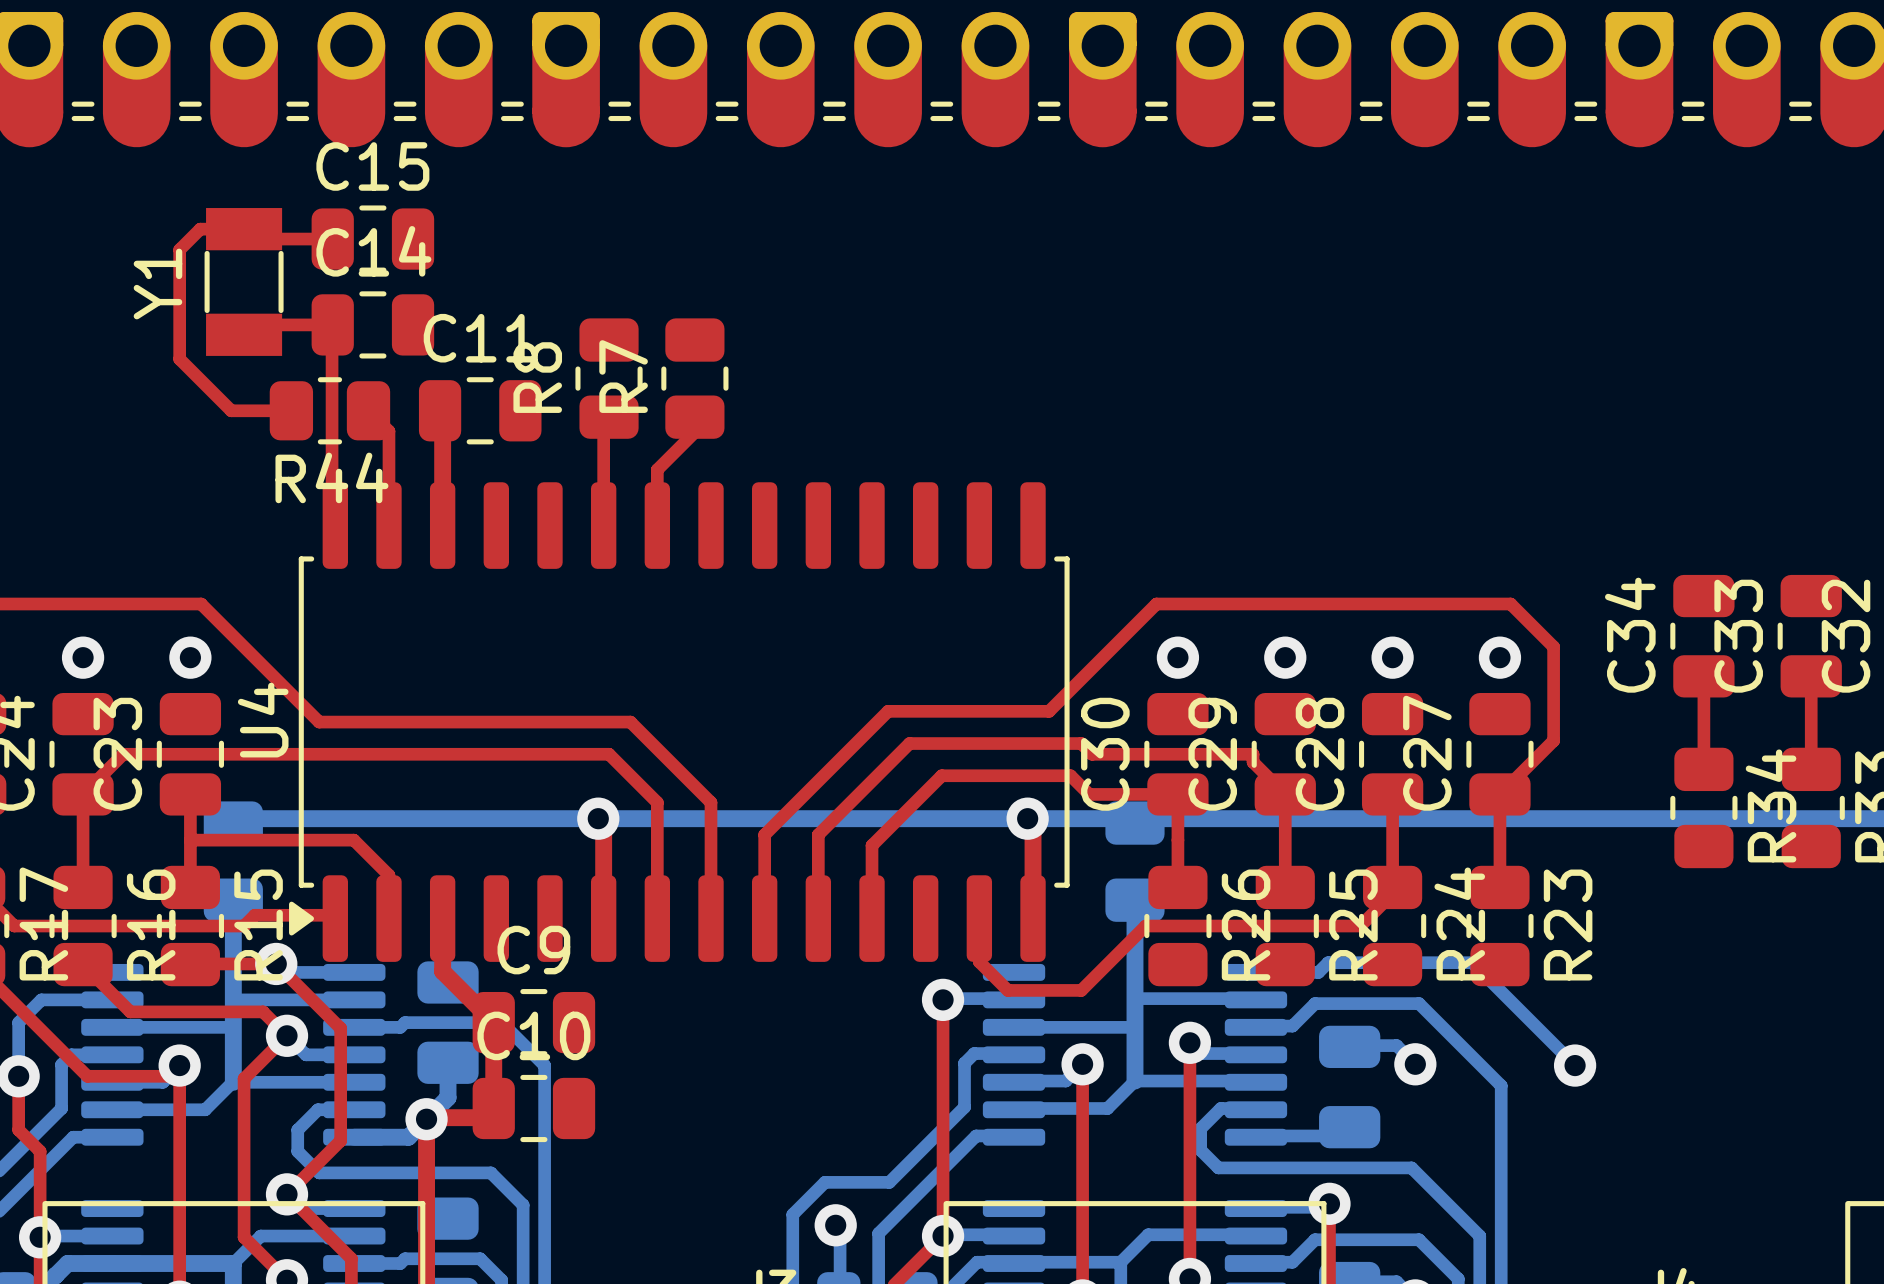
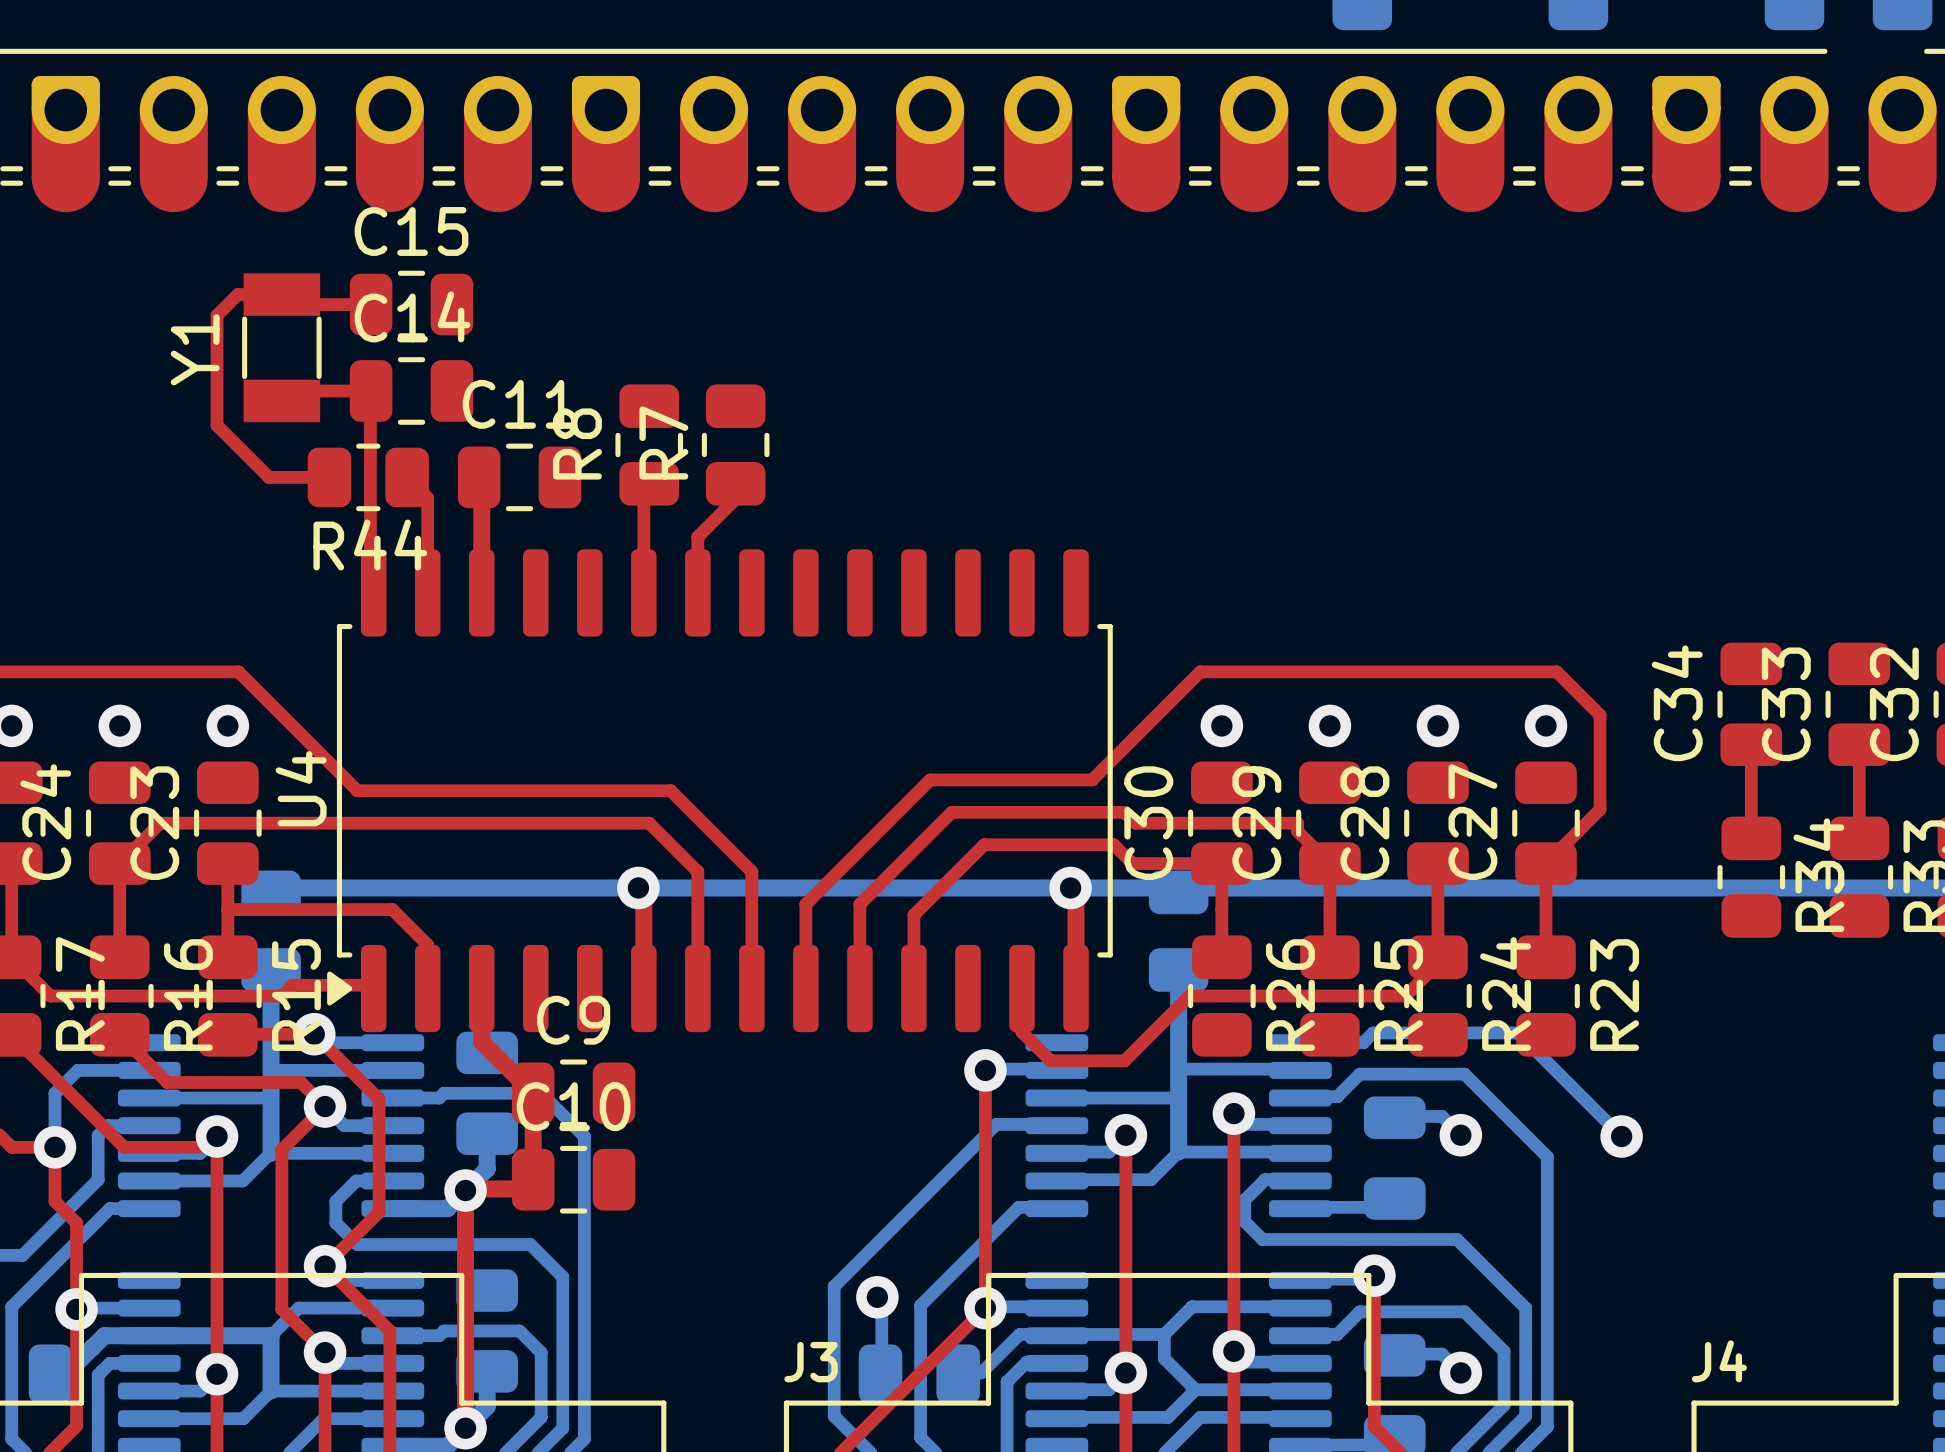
bottom track: (974, 1053) (964, 1063) (964, 1107) (889, 1182) (824, 1182) -> (1016, 1124) (996, 1124) (866, 1254)

